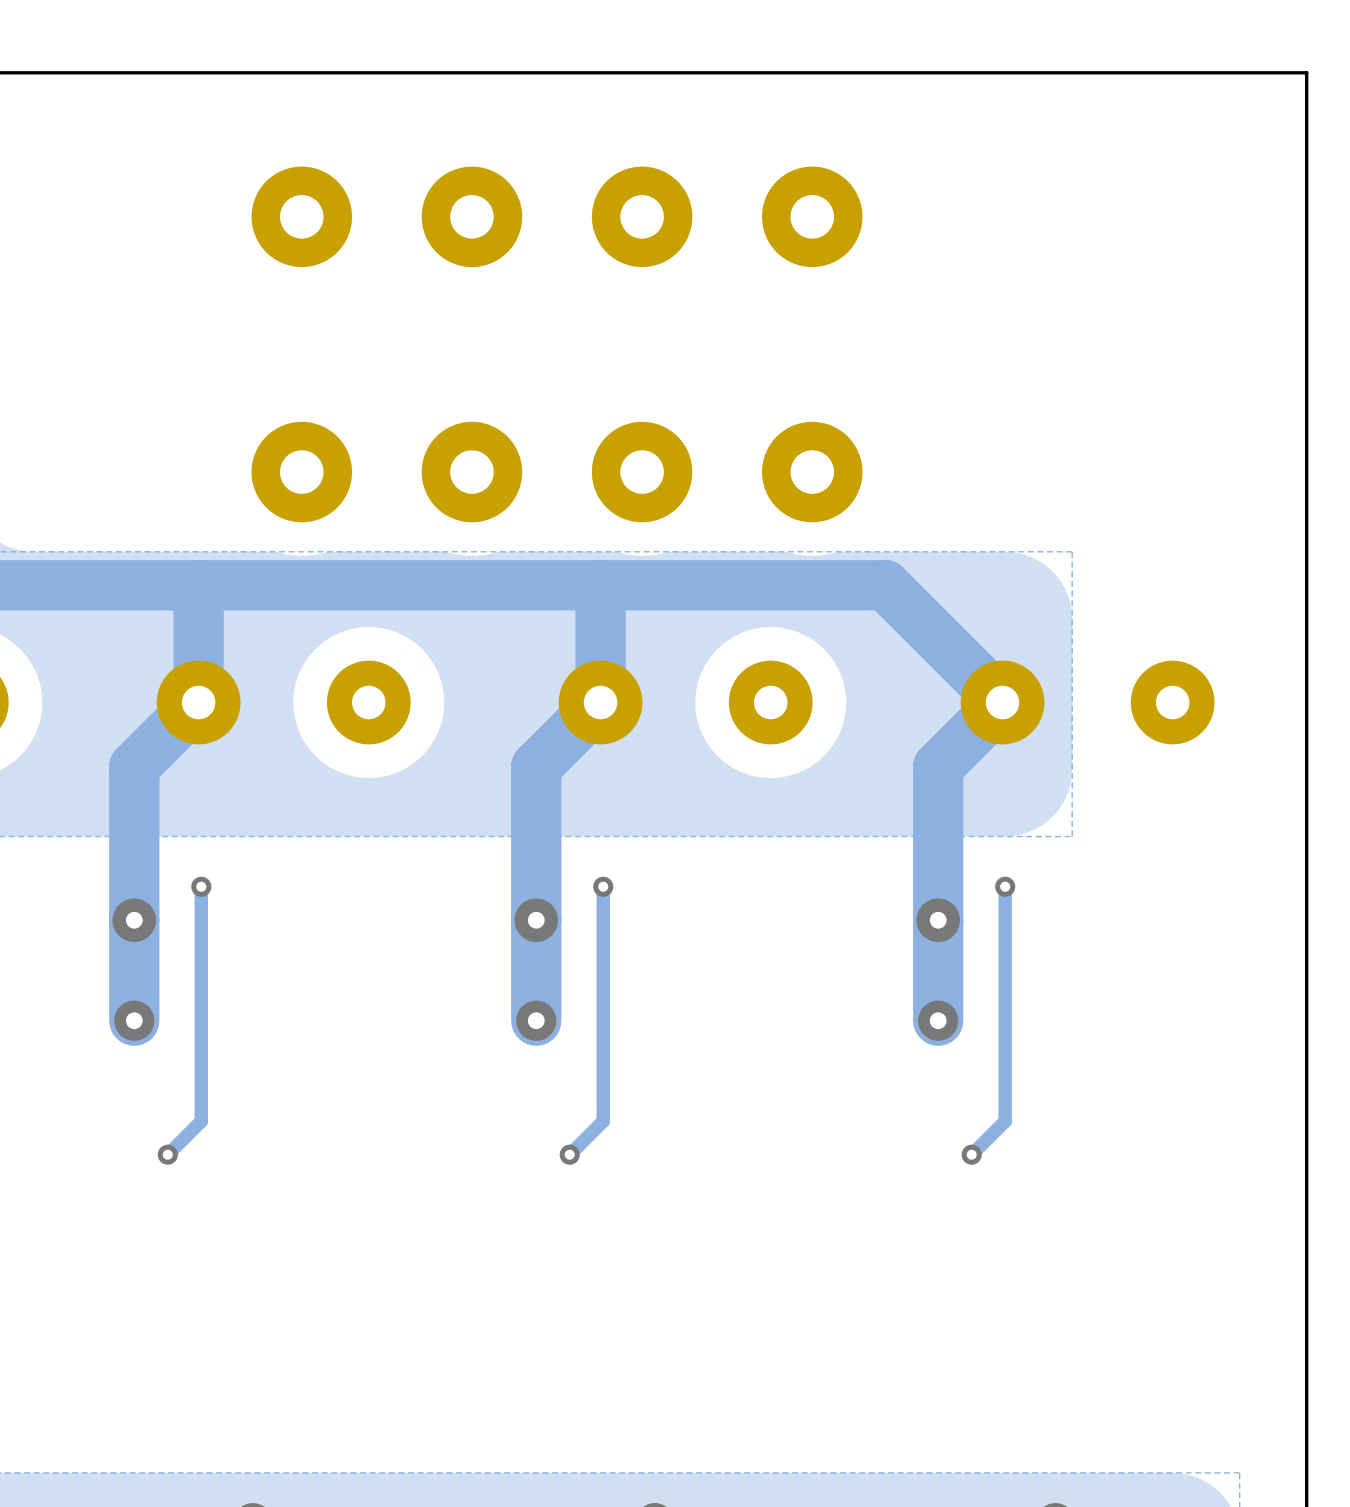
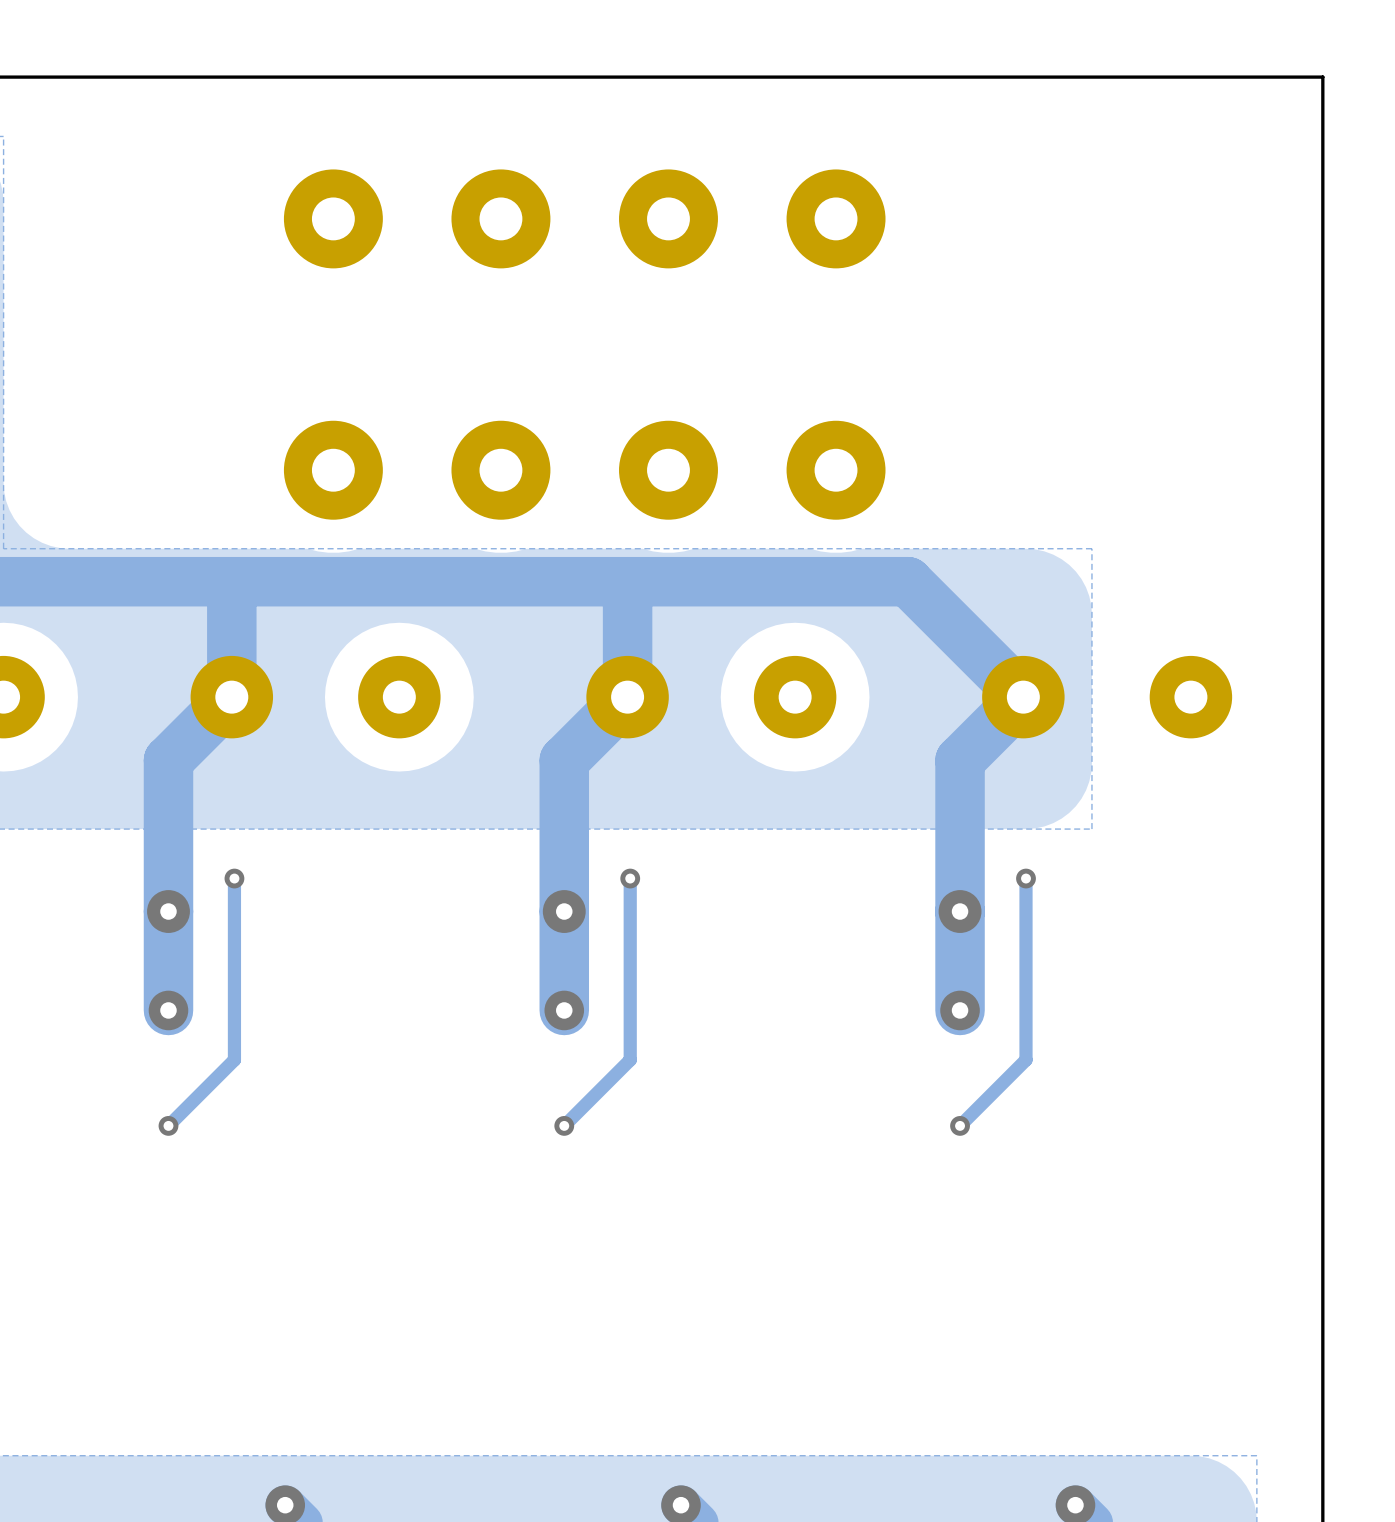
track: (201, 1070) (201, 1121) (167, 1154) -> (234, 1059) (168, 1125)
track: (603, 1070) (603, 1121) (569, 1154) -> (630, 1059) (564, 1125)
track: (1005, 1070) (1005, 1121) (971, 1154) -> (1026, 1059) (960, 1125)
via position: (167, 1154) -> (168, 1125)
via position: (569, 1154) -> (564, 1125)
via position: (971, 1154) -> (960, 1125)

